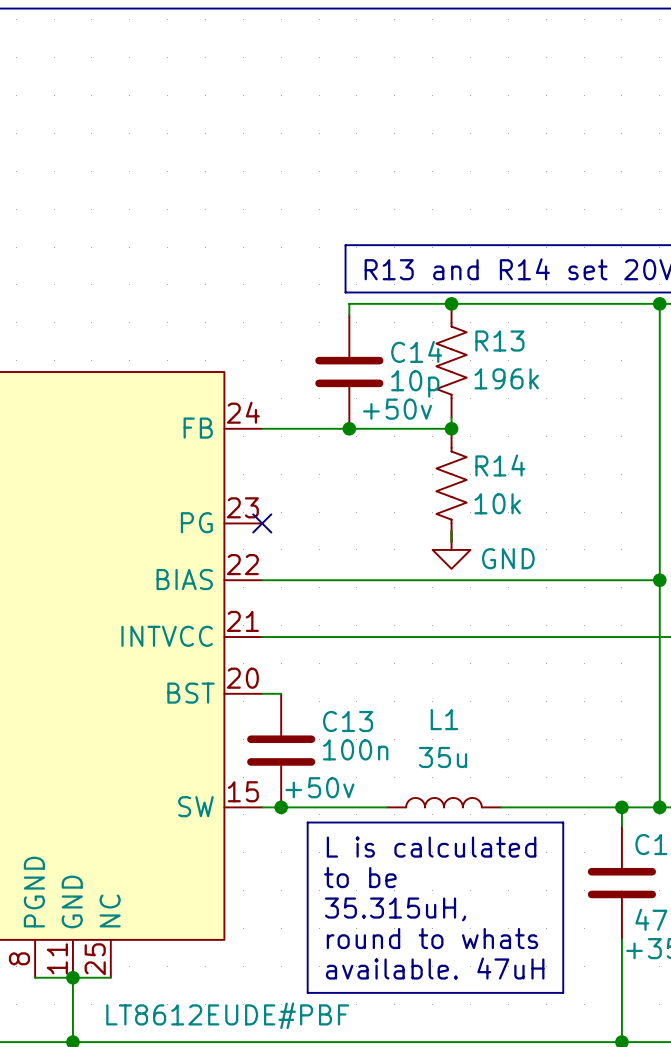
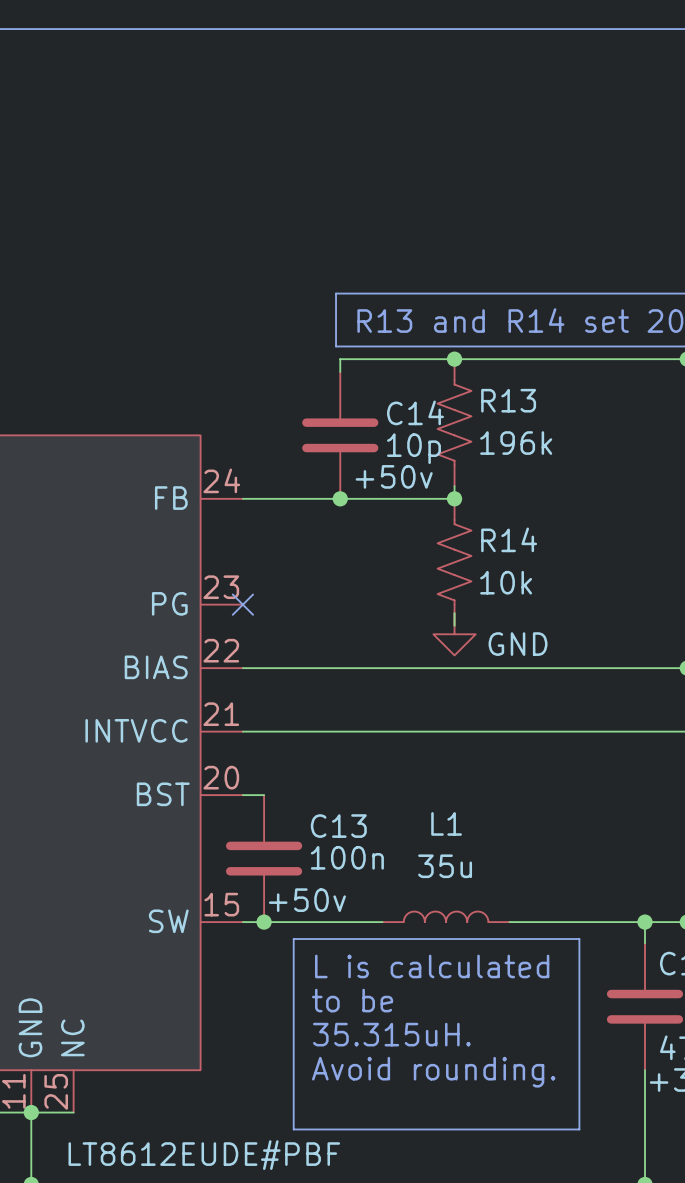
text: 35.315uH, (395, 909) -> 35.315uH. (391, 1034)
text: round to whats (432, 938) -> Avoid rounding. (433, 1072)
text: available. 47uH (435, 968) -> none

